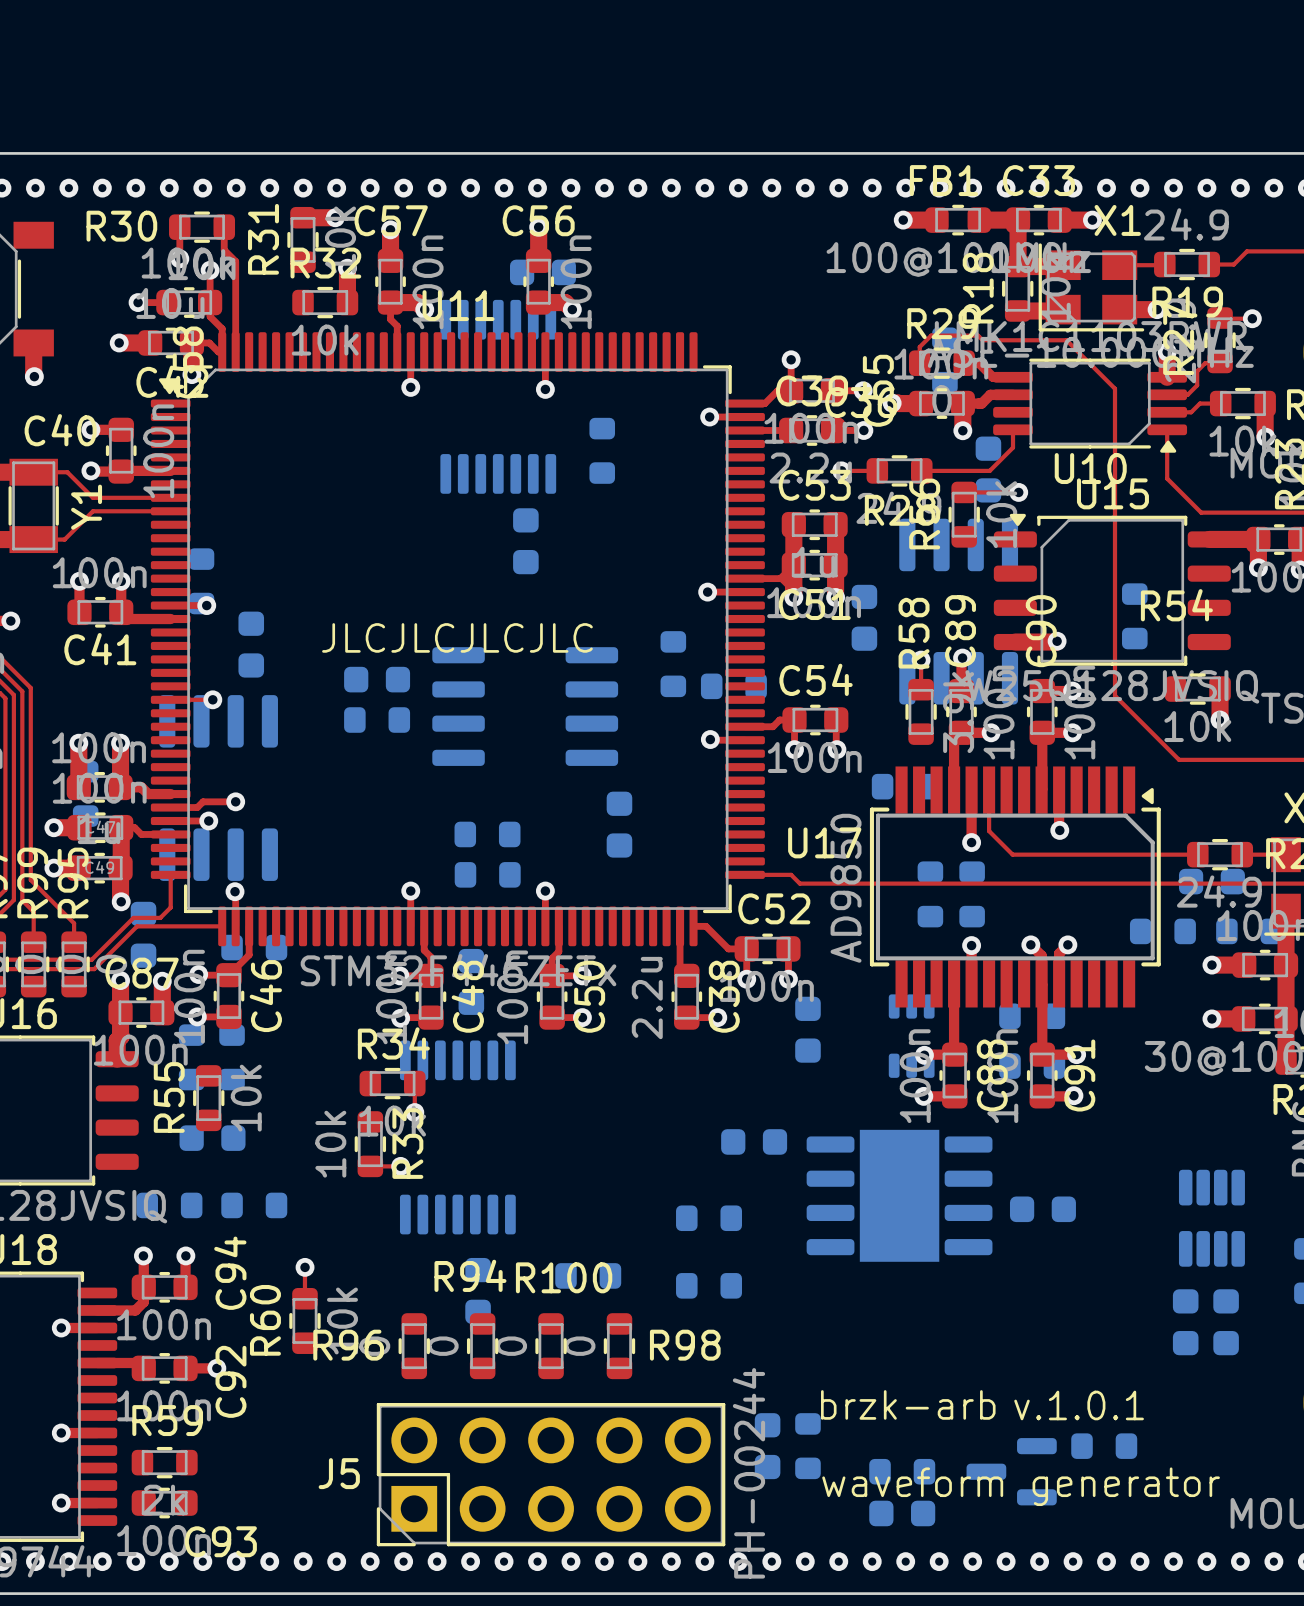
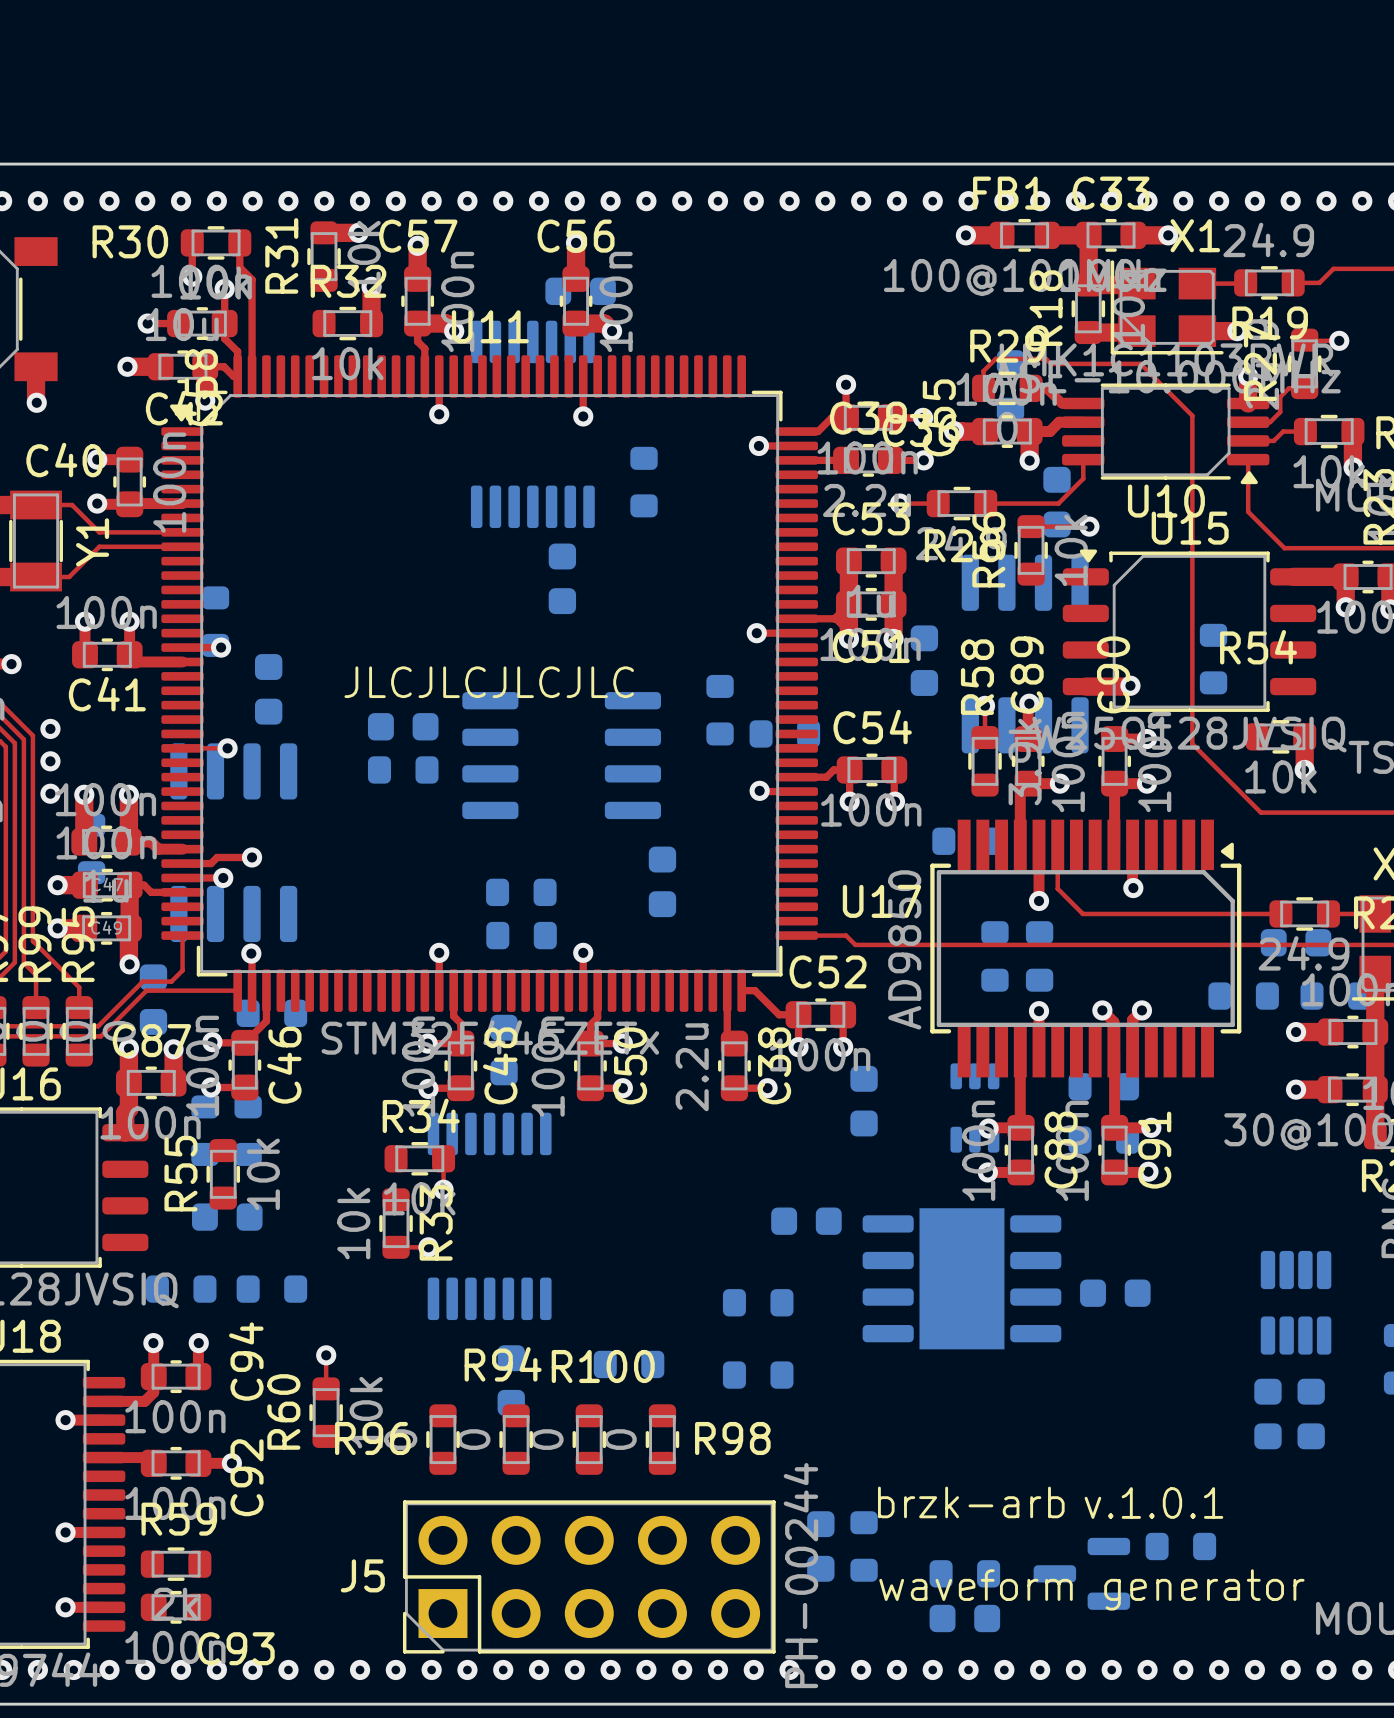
via: none -> (50, 728)
via: none -> (50, 761)
via: none -> (50, 793)

